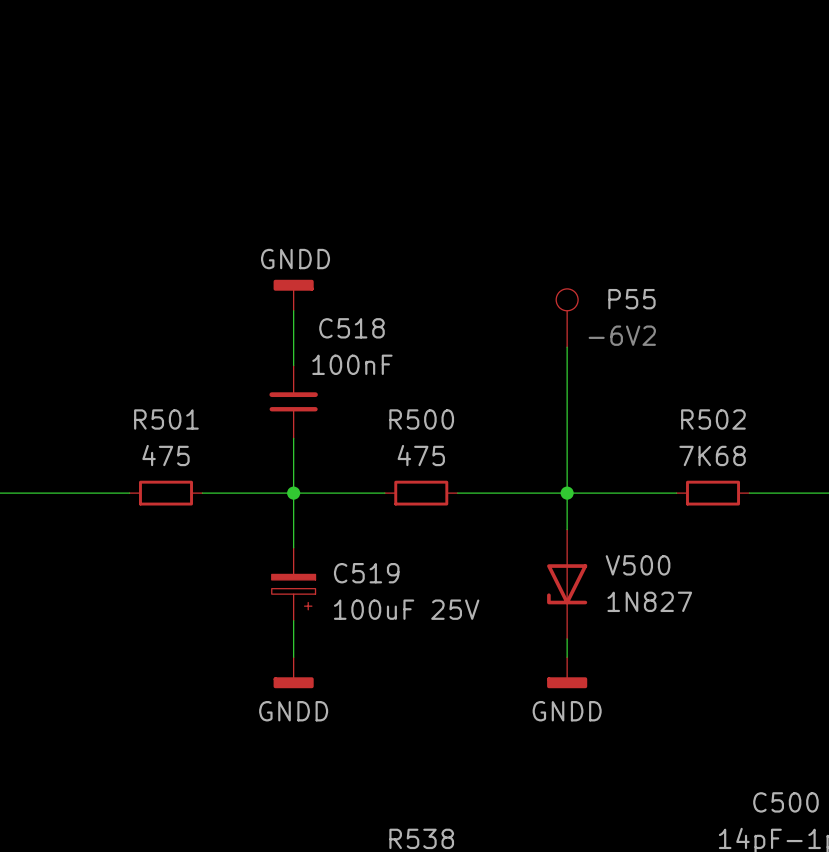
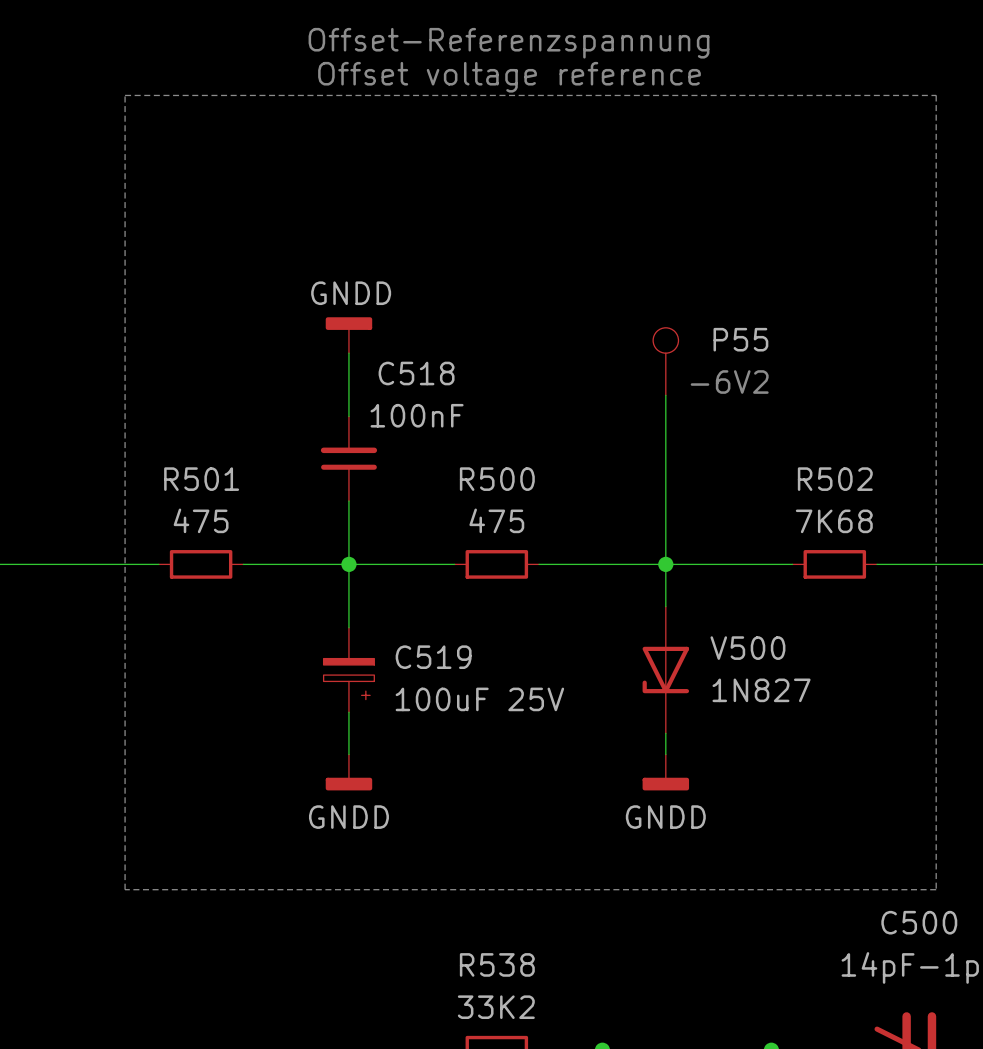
text: none -> Offset-Referenzspannung (509, 43)
text: none -> Offset voltage reference (509, 77)
line: none -> (125, 95) (936, 95) (936, 889) (125, 889) (125, 95)

